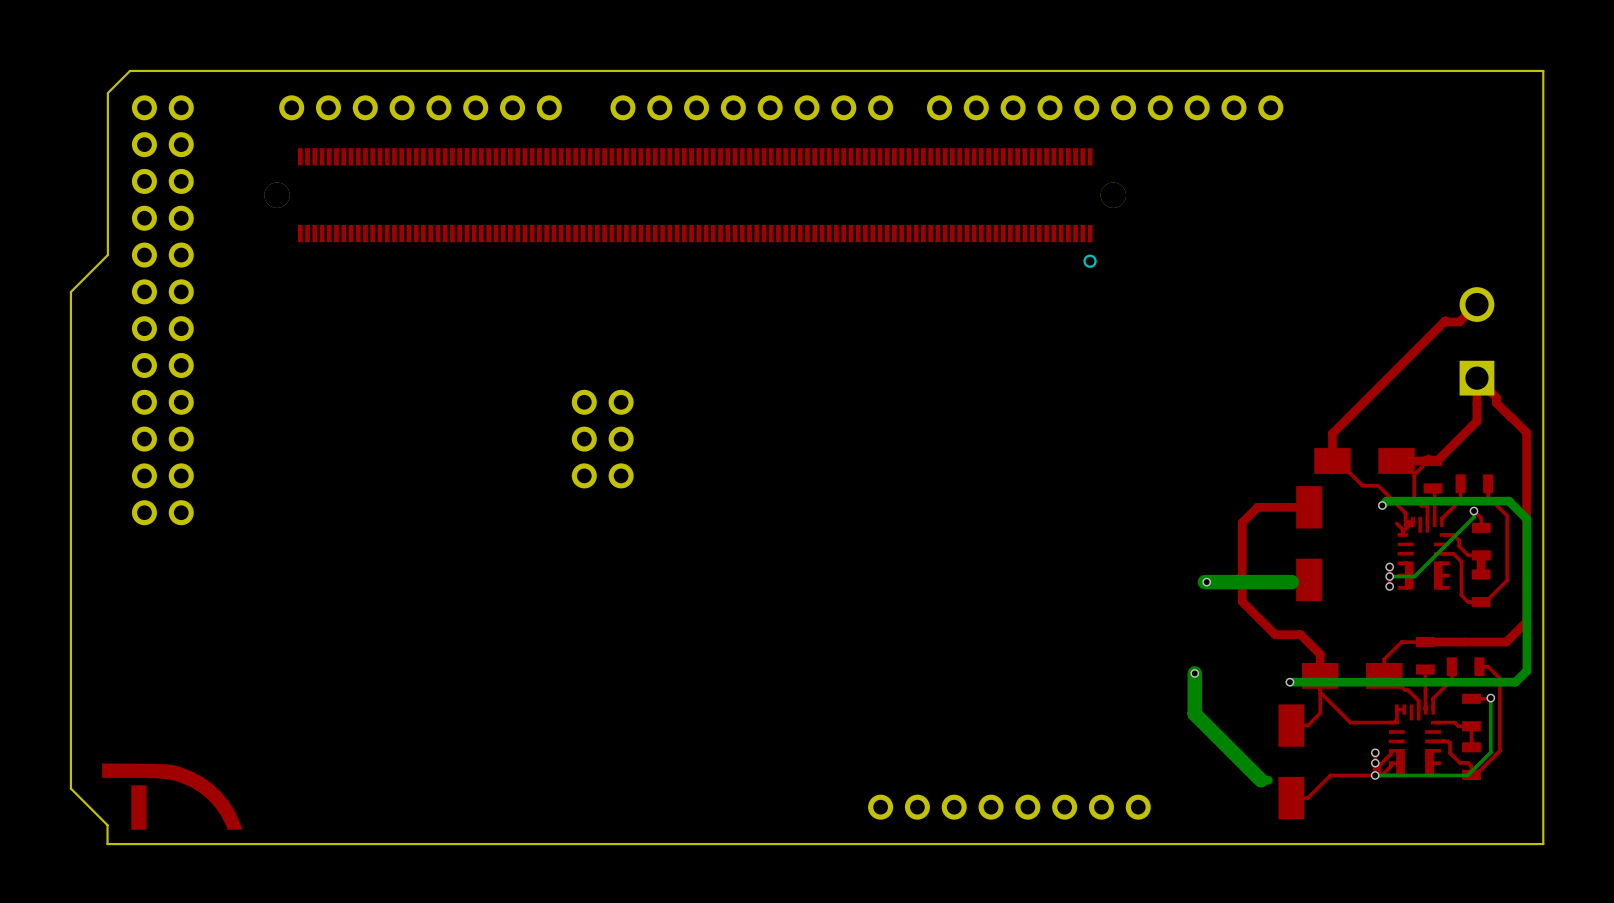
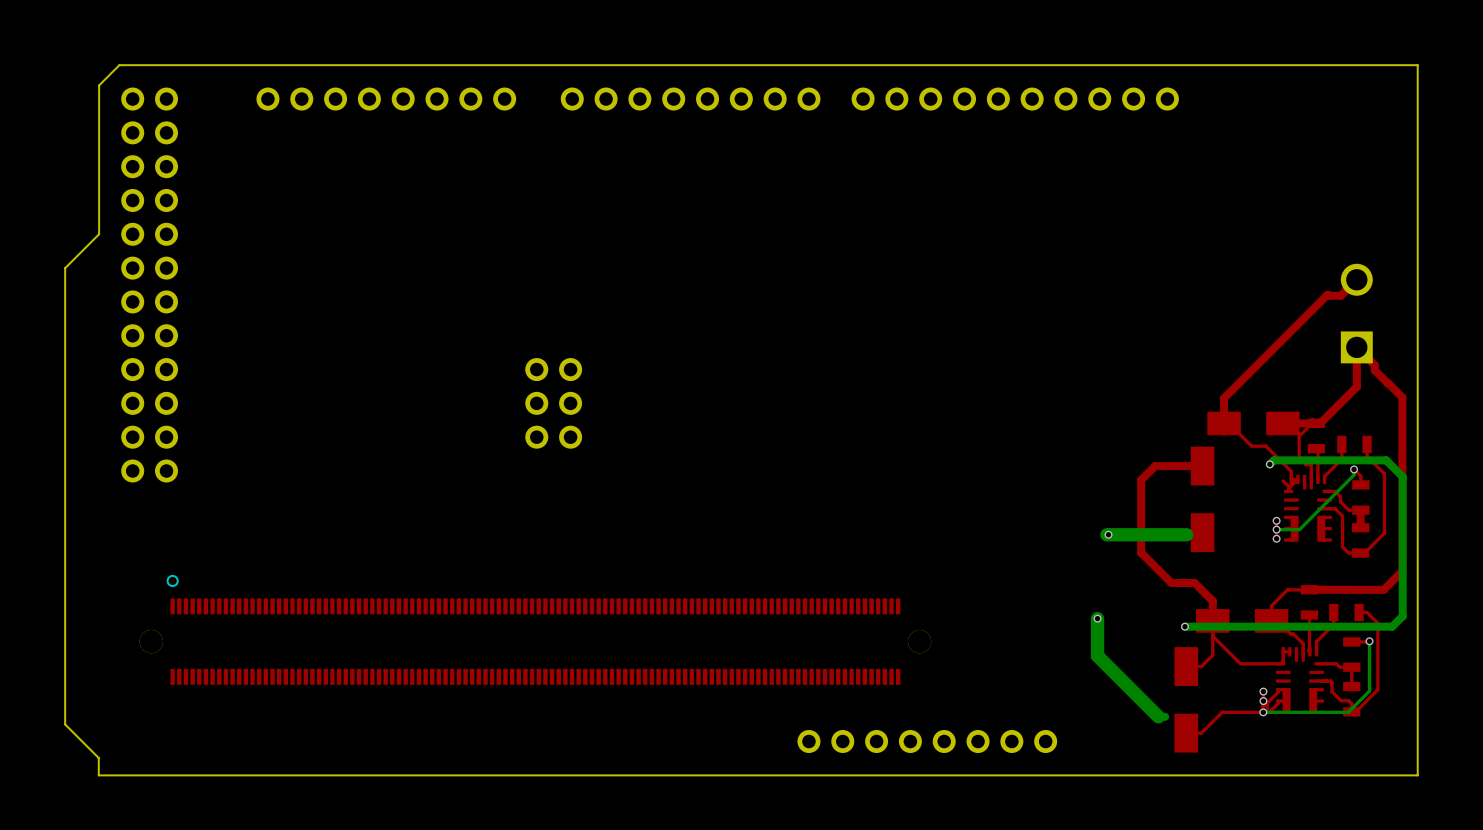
part: (695, 207) -> none
part: none -> (535, 629)
drawing: [102, 763, 243, 830] -> none

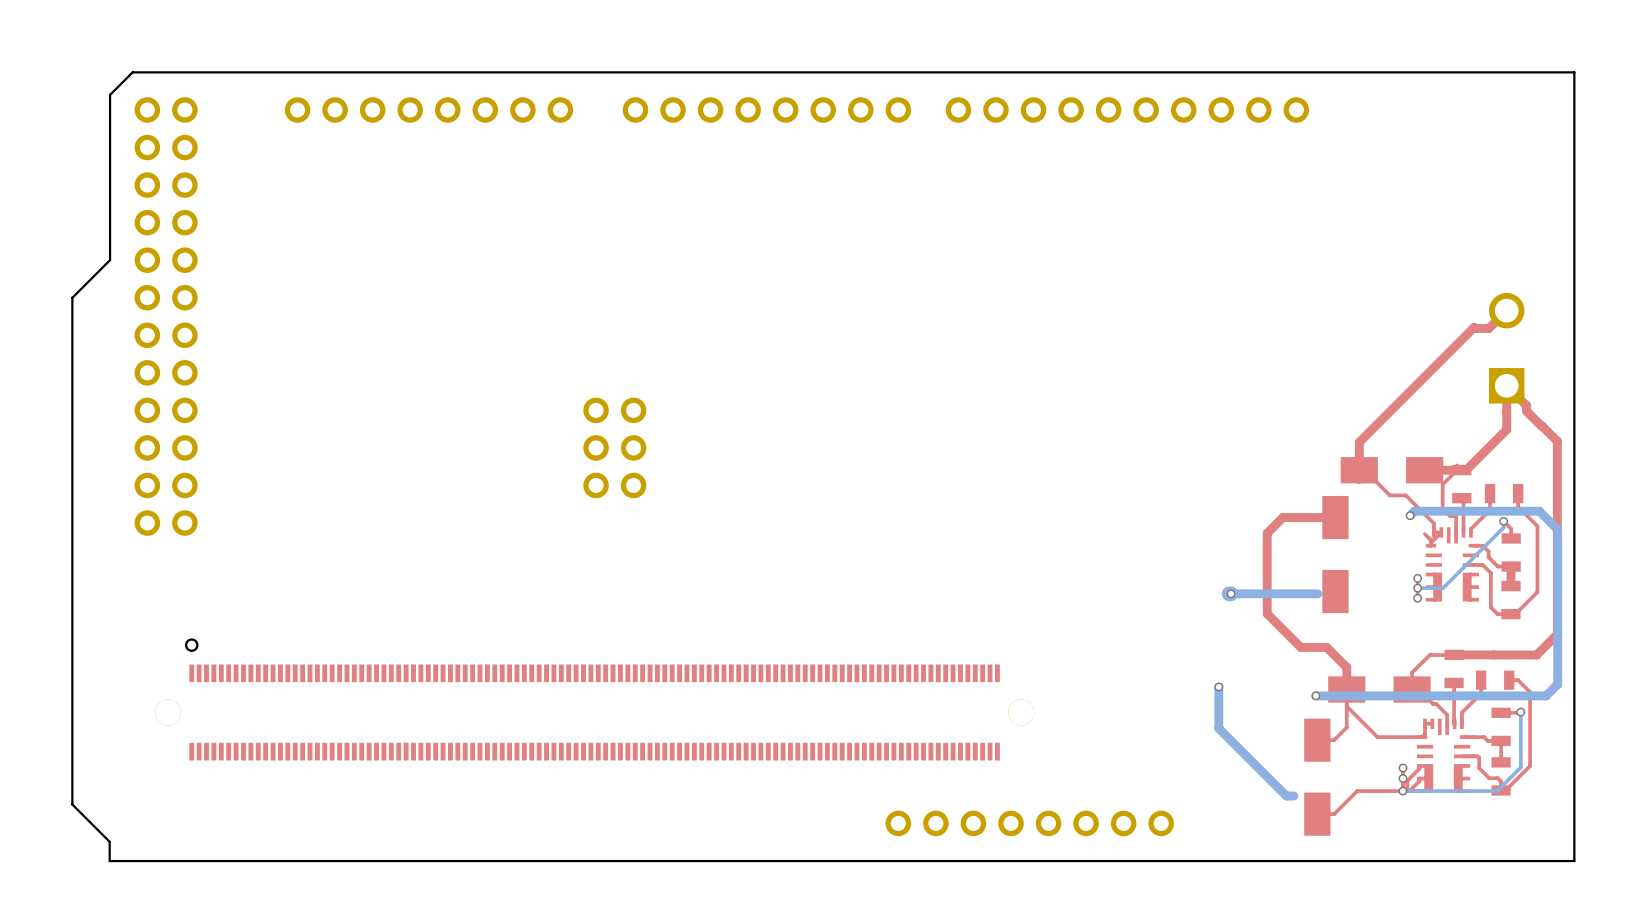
bottom track width: thick (1186, 534) (1108, 534) -> thin (1317, 593) (1231, 593)
bottom track width: thick (1097, 618) (1097, 655) (1158, 716) -> thin (1218, 686) (1218, 728) (1286, 796)

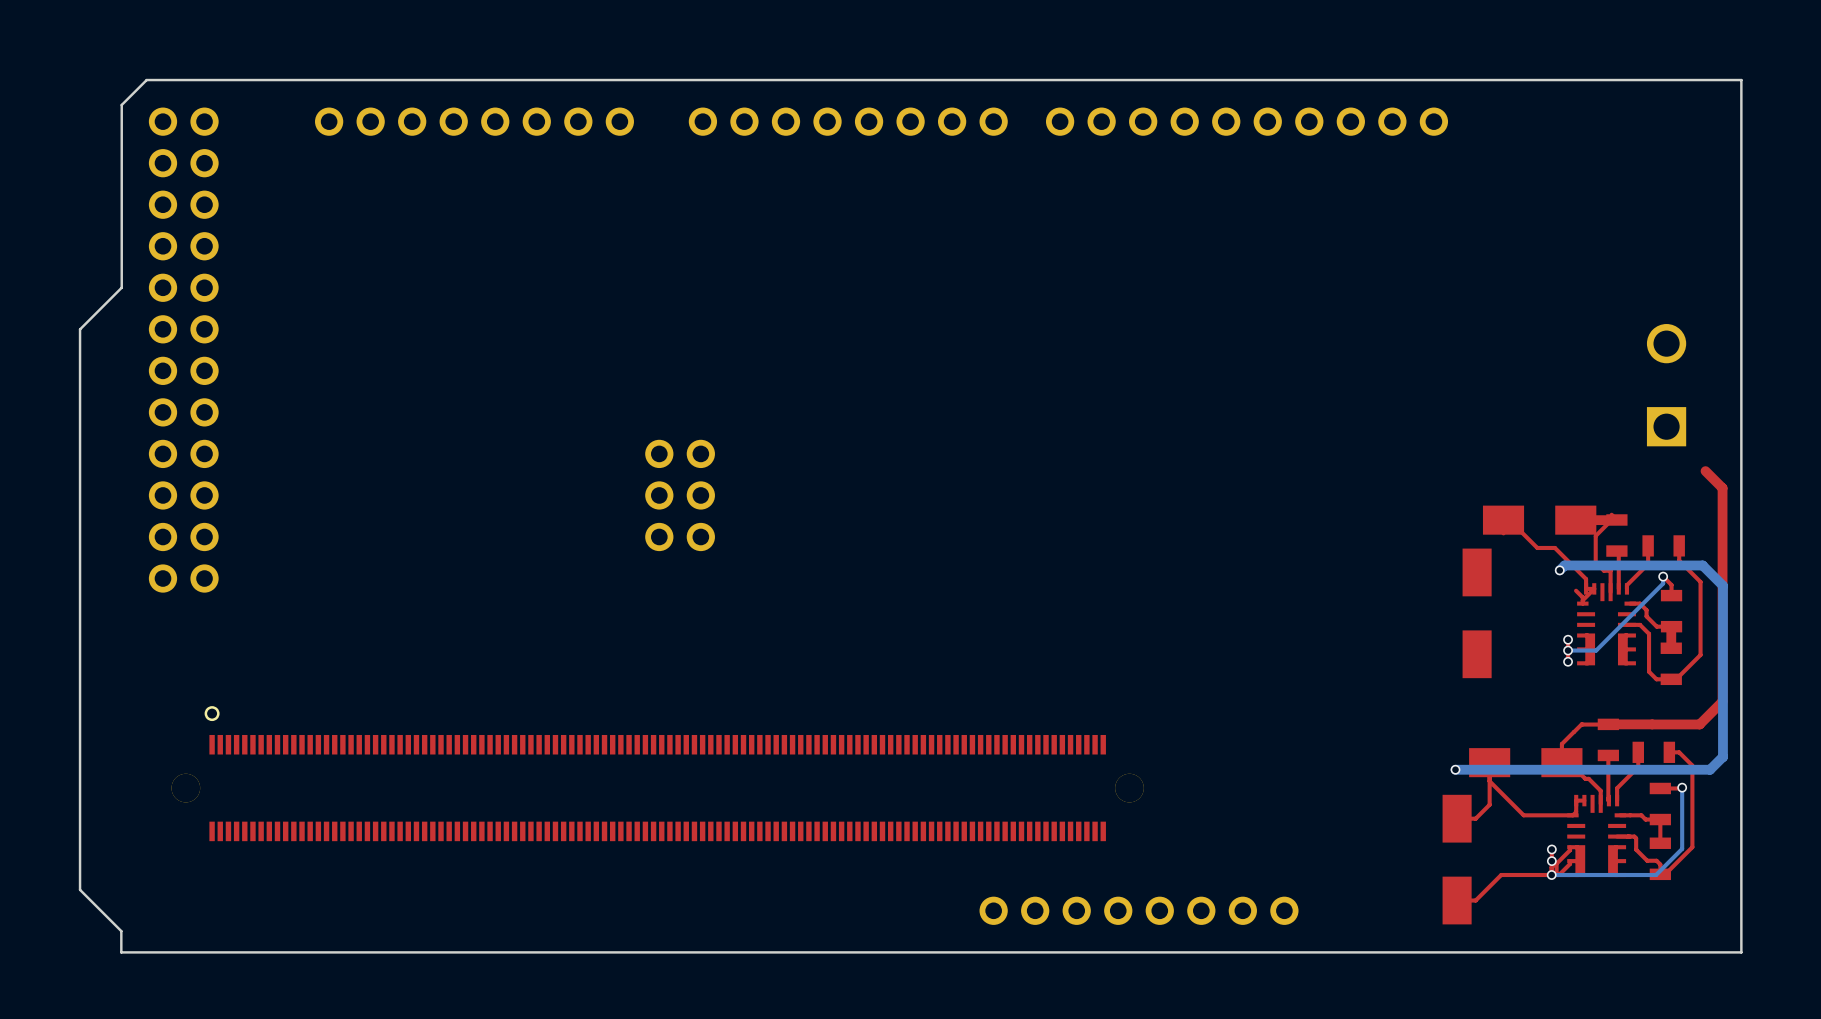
top track: (1506, 310) (1488, 328) (1474, 327) (1359, 442) (1359, 470) -> none
top track: (1541, 425) (1526, 411) (1526, 405) (1506, 385) (1506, 429) (1466, 470) (1461, 470) -> none
top track: (1335, 517) (1282, 517) (1267, 533) (1267, 613) (1300, 647) (1326, 647) (1346, 667) (1346, 689) -> none
via: (1231, 593) -> none
bottom track: (1317, 593) (1229, 593) (1231, 593) -> none
bottom track: (1218, 686) (1218, 728) (1286, 796) (1293, 796) -> none
via: (1218, 686) -> none

